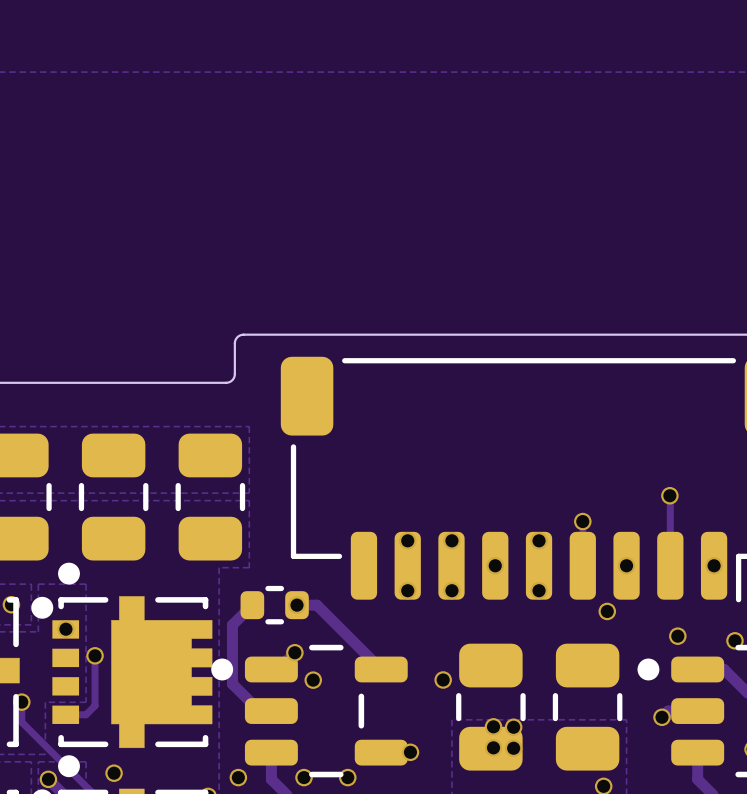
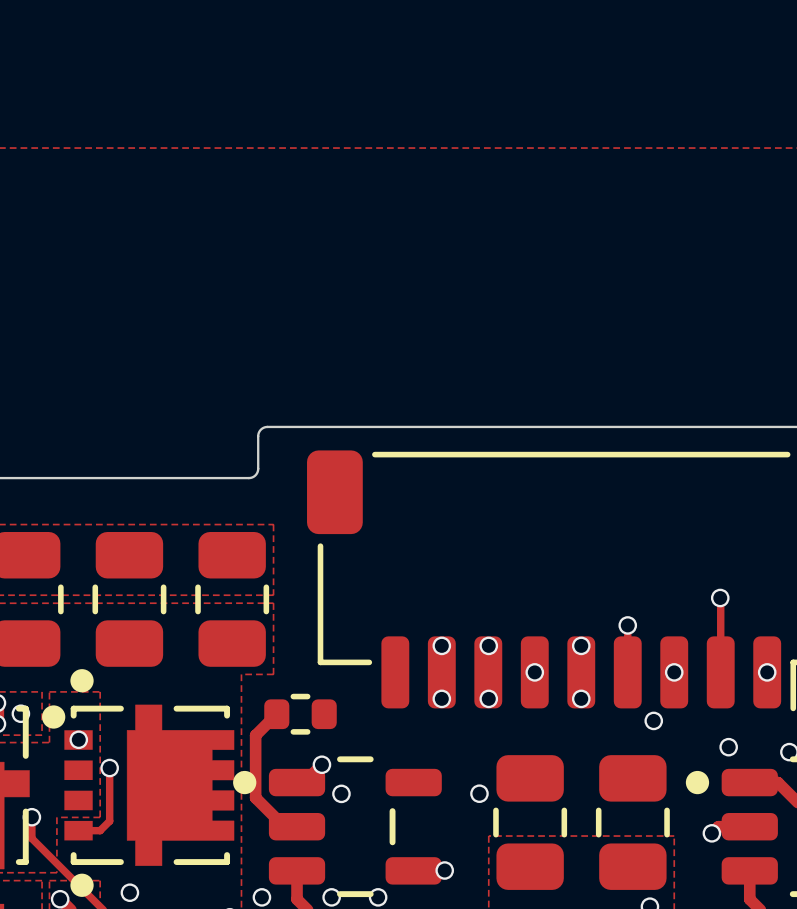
track: (297, 605) (316, 605) (381, 669) -> none
via: (297, 605) -> none
via: (493, 726) -> none
via: (513, 727) -> none
via: (493, 747) -> none
via: (513, 748) -> none

